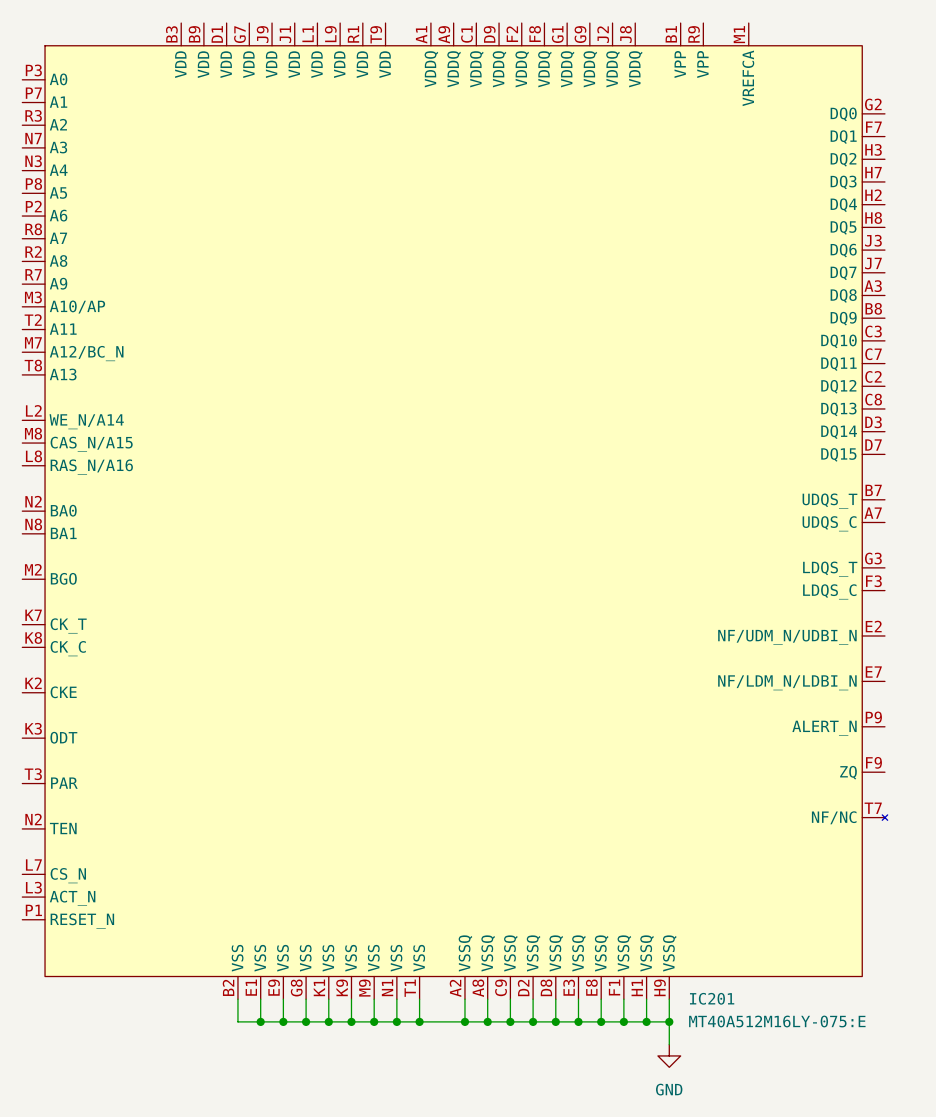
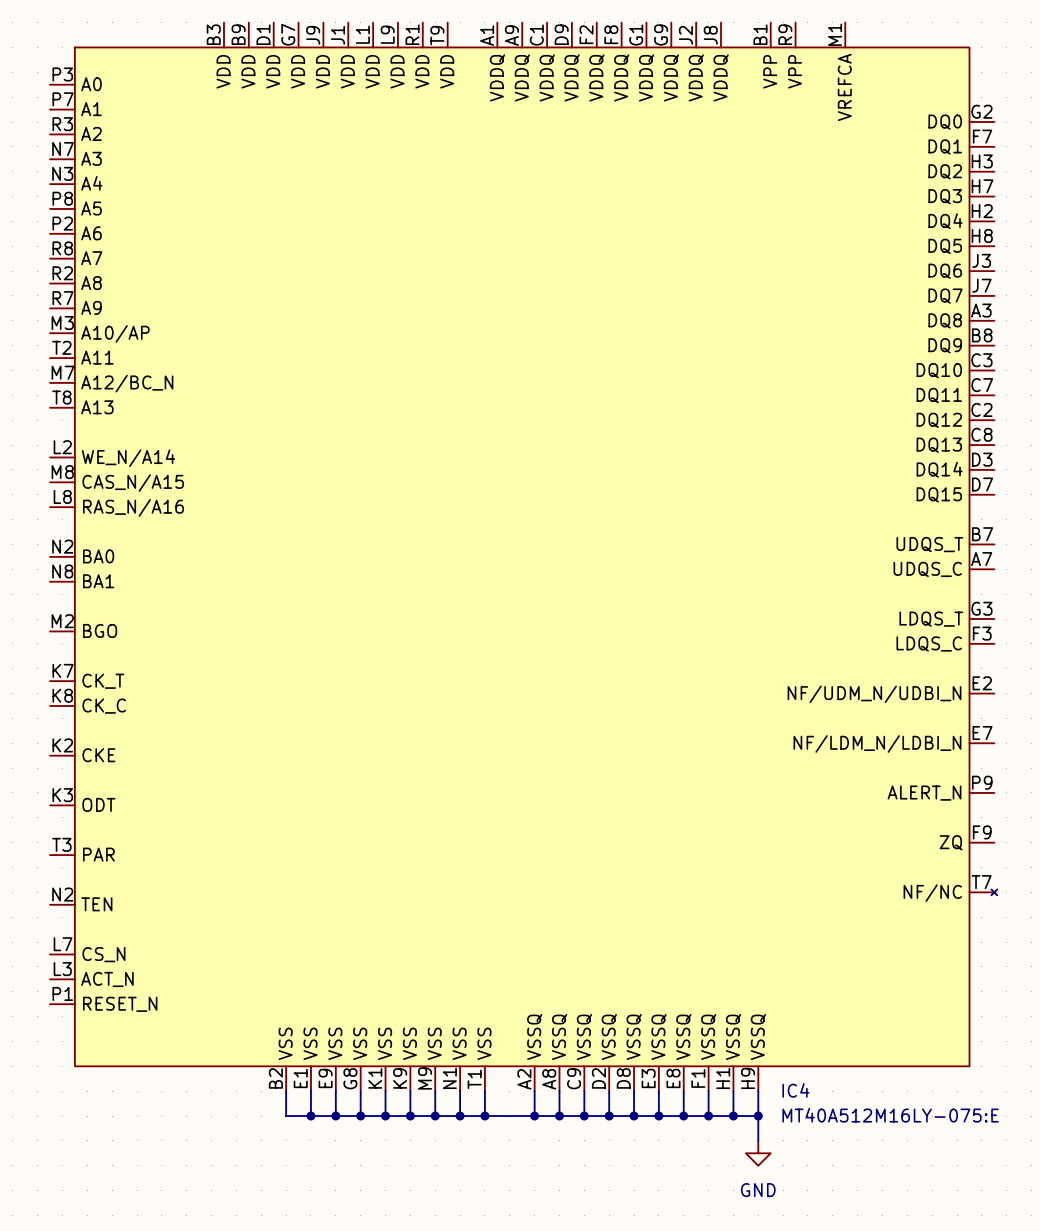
IC201 name: IC201 (712, 998) -> IC4 (795, 1090)

